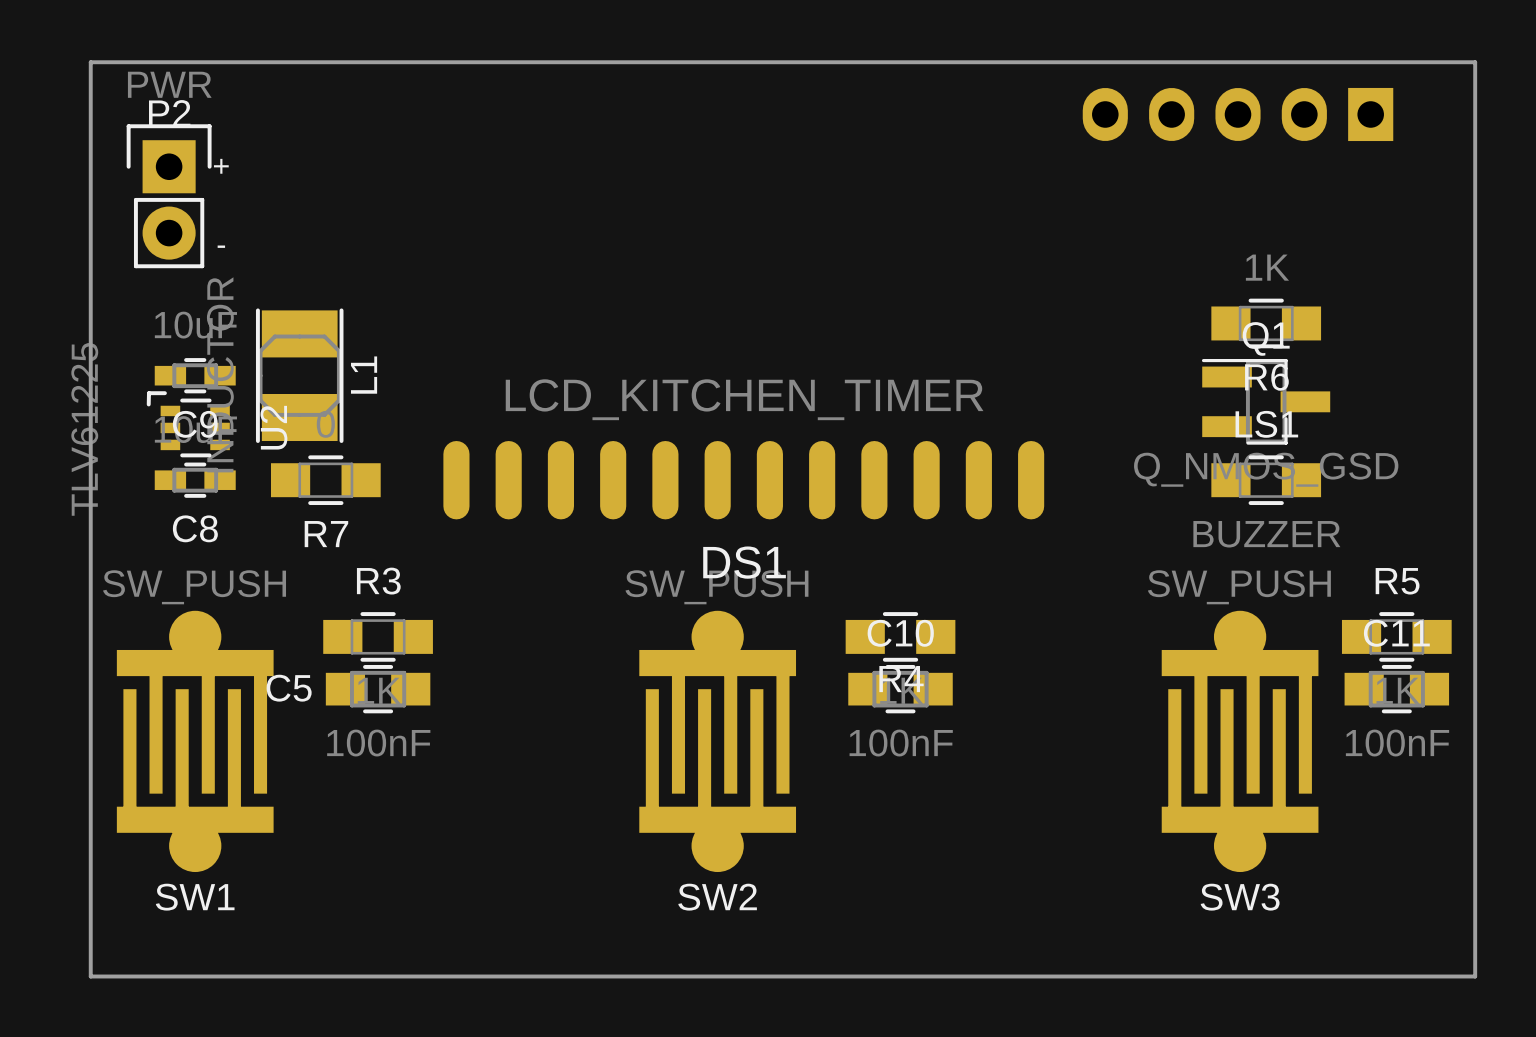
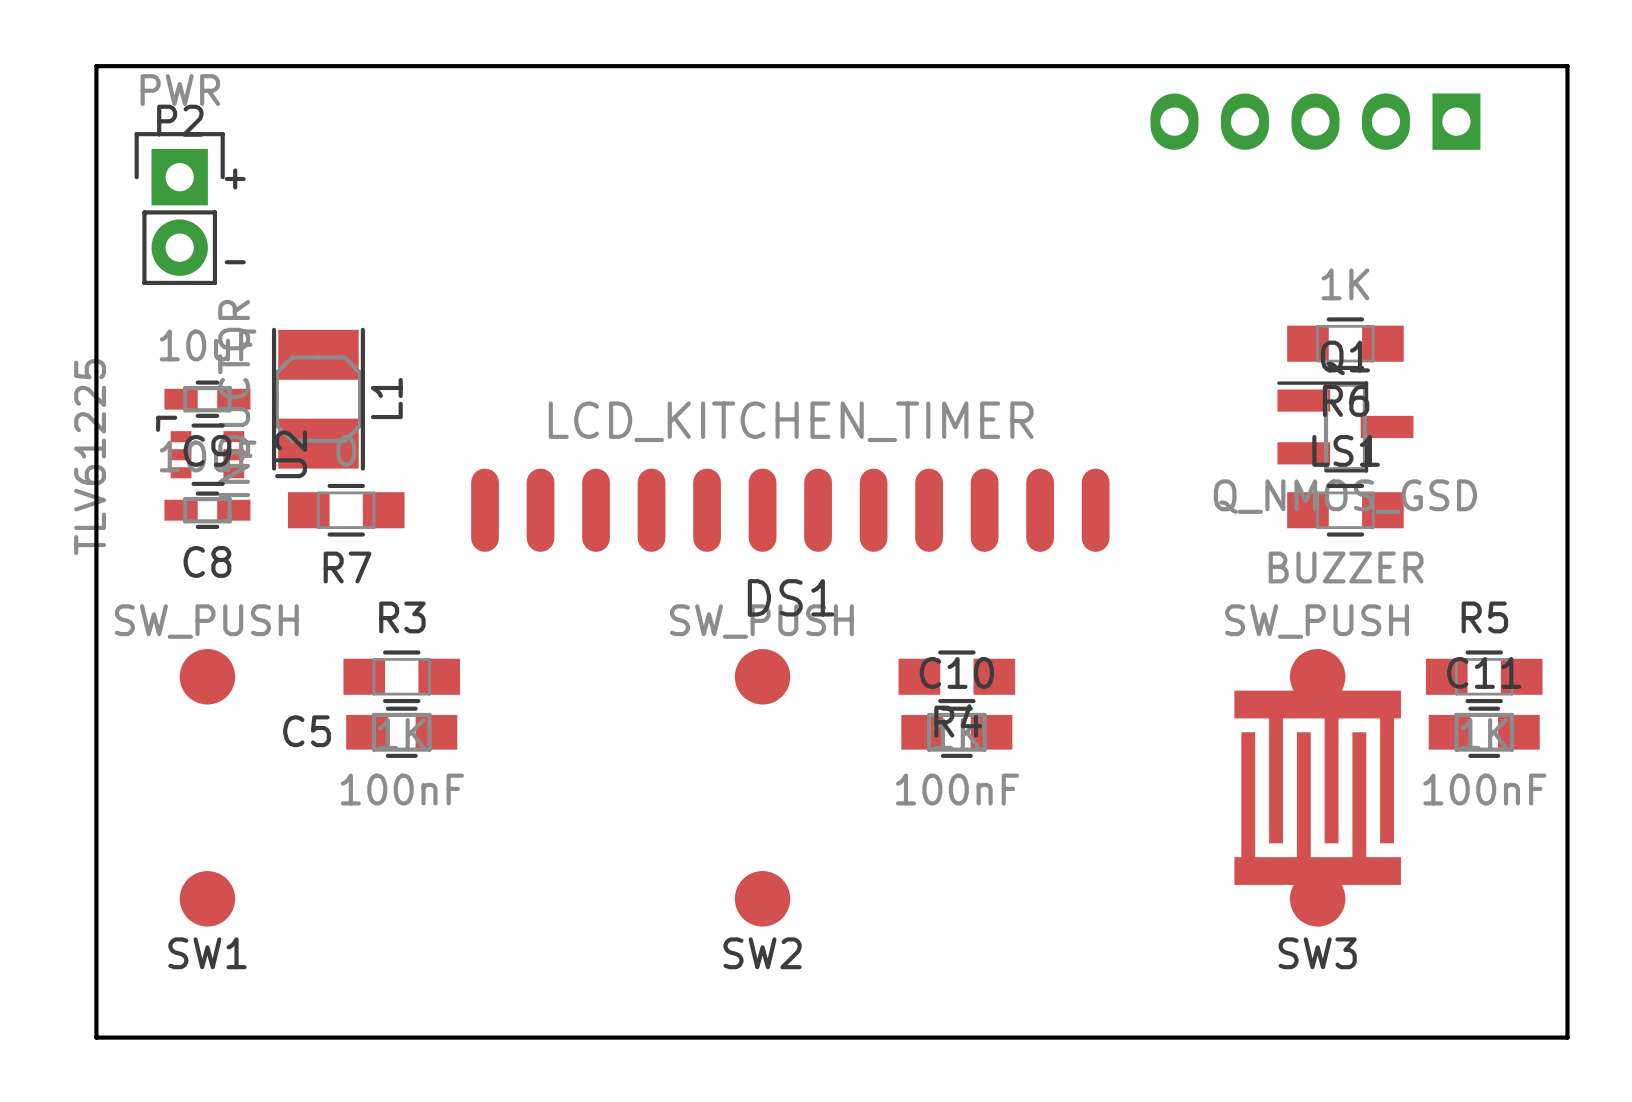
SW1 footprint: [116, 610, 274, 873] -> [179, 649, 236, 927]
SW2 footprint: [639, 610, 797, 873] -> [734, 649, 791, 927]

